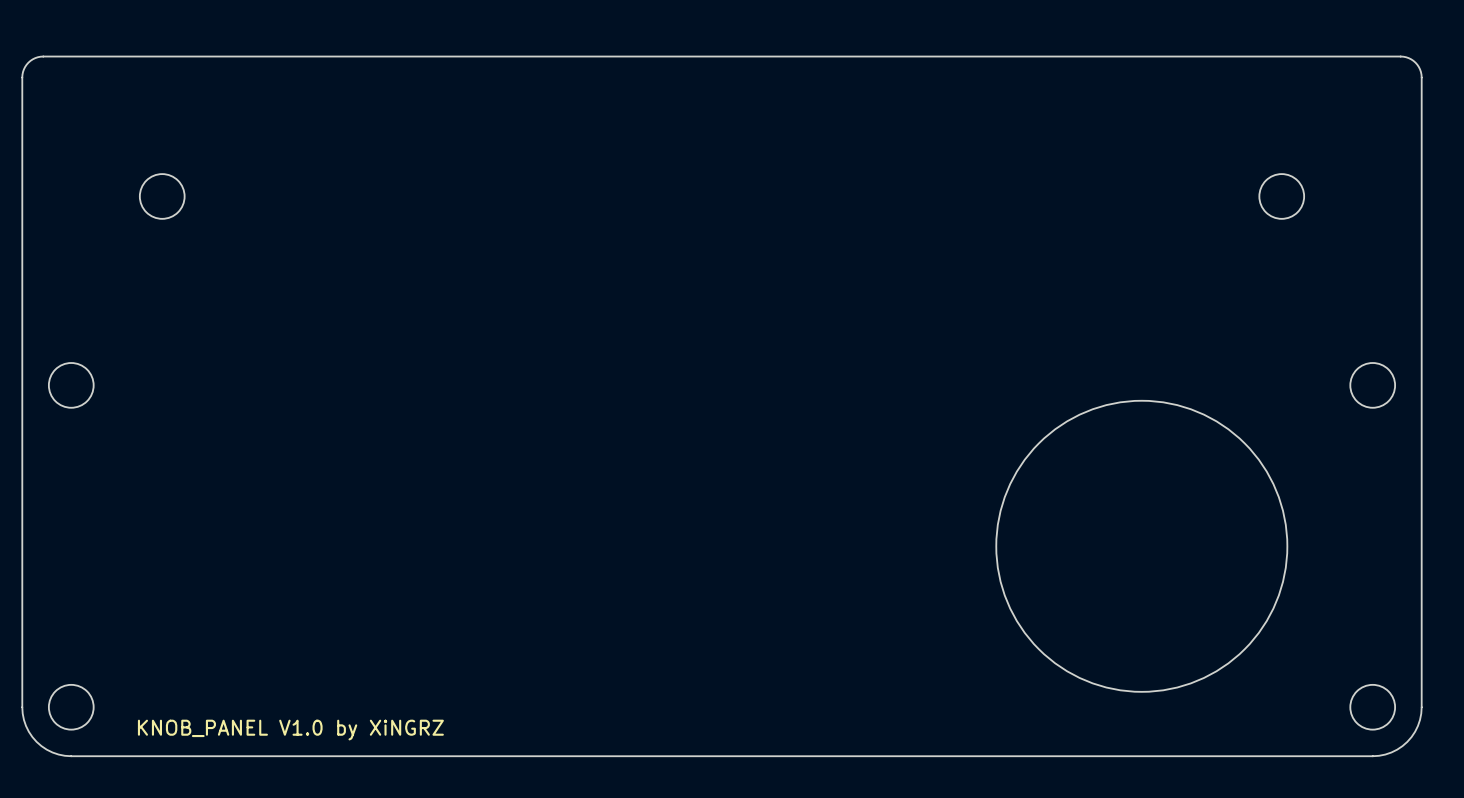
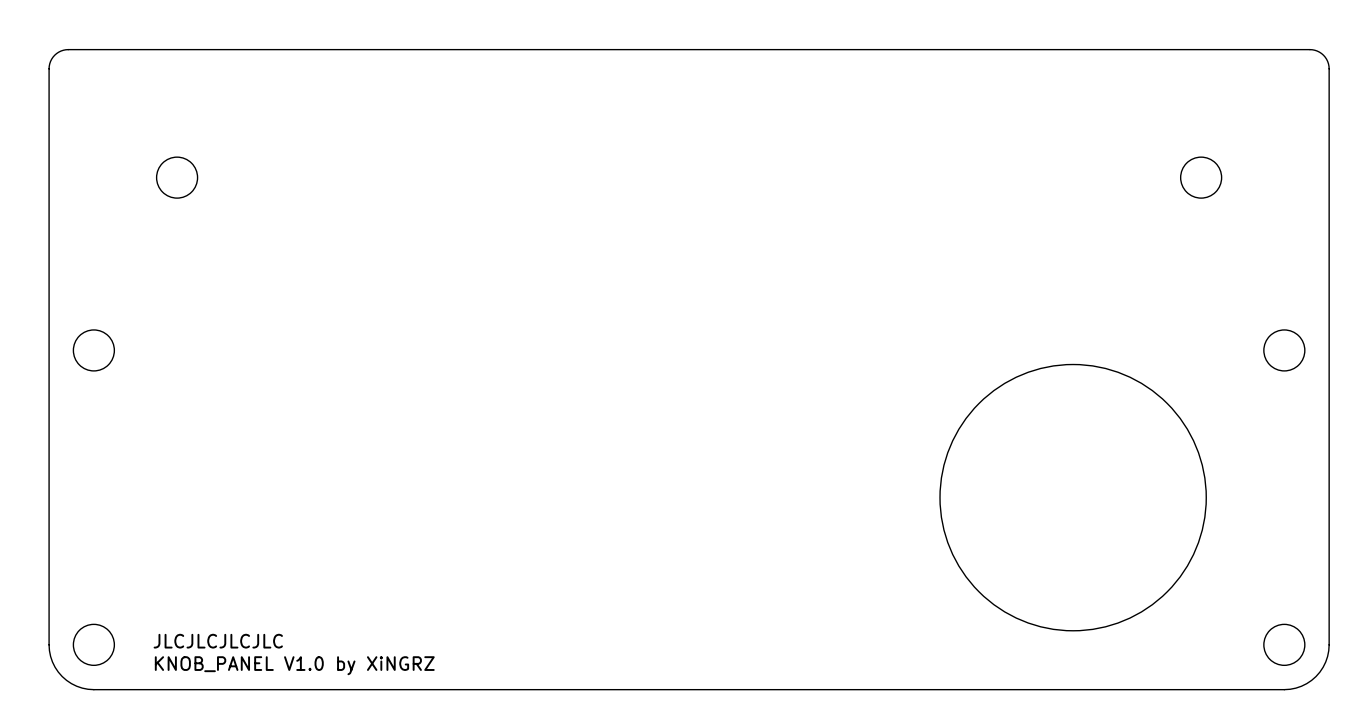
text: none -> JLCJLCJLCJLC (218, 641)

